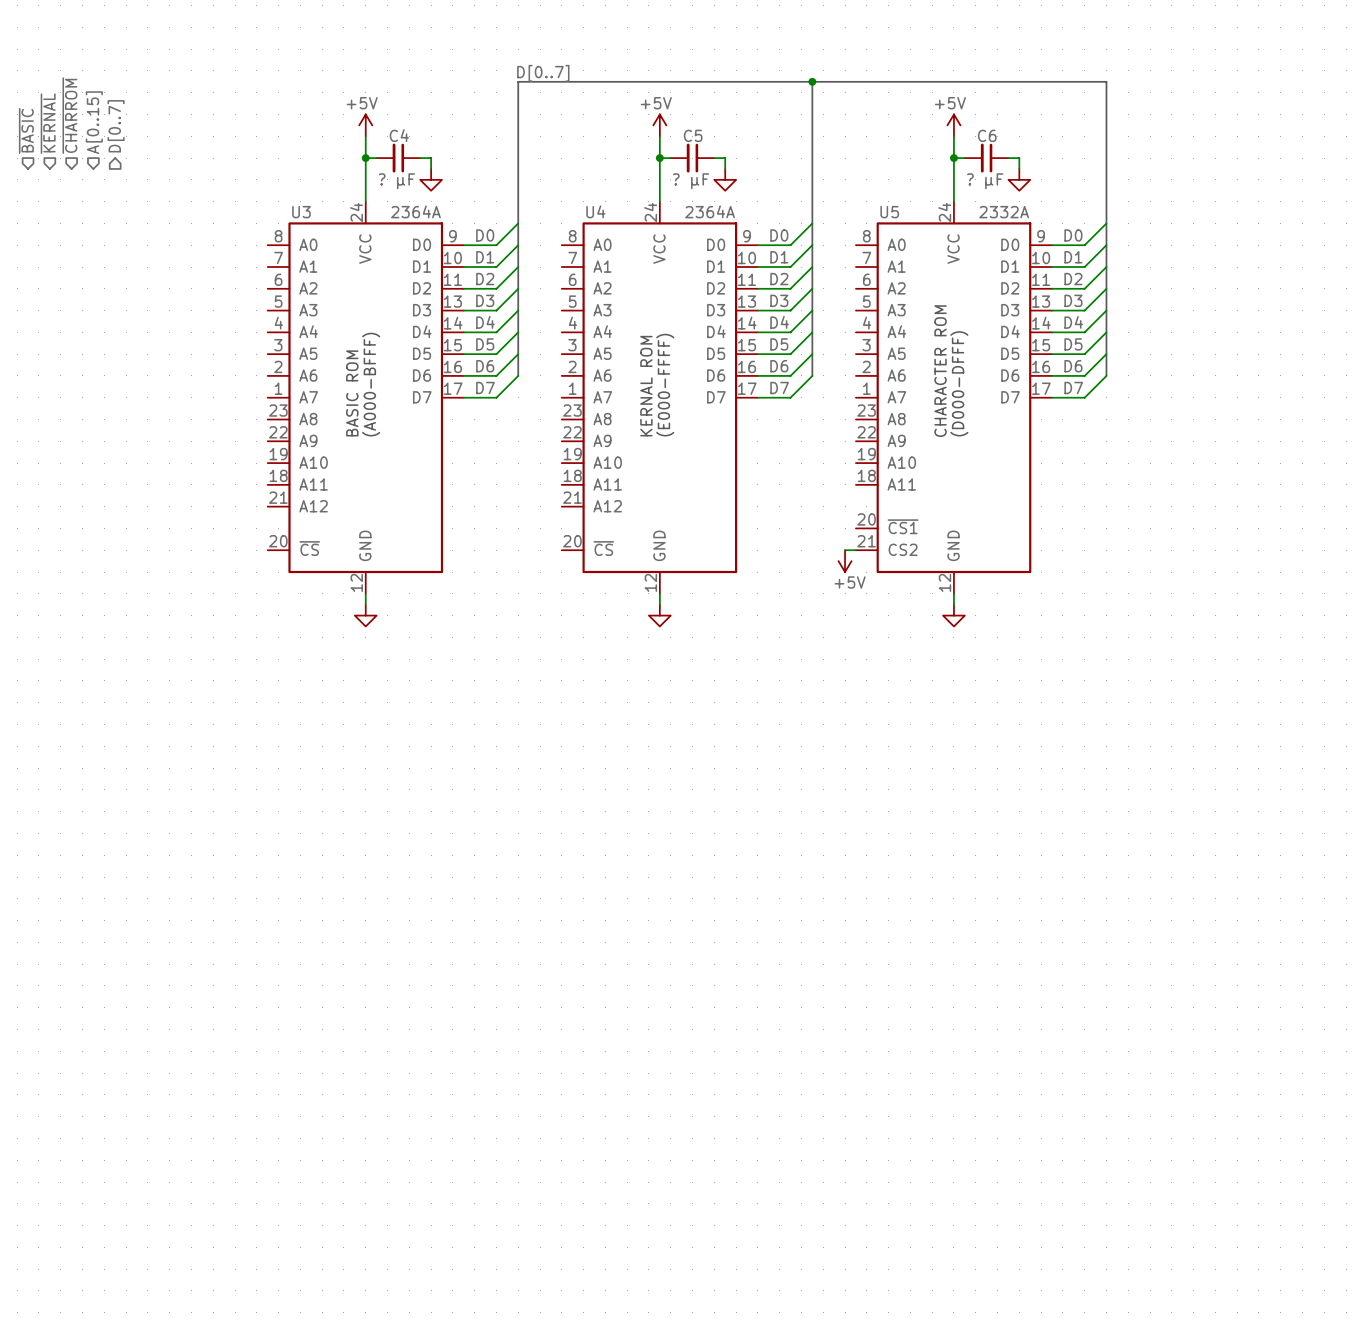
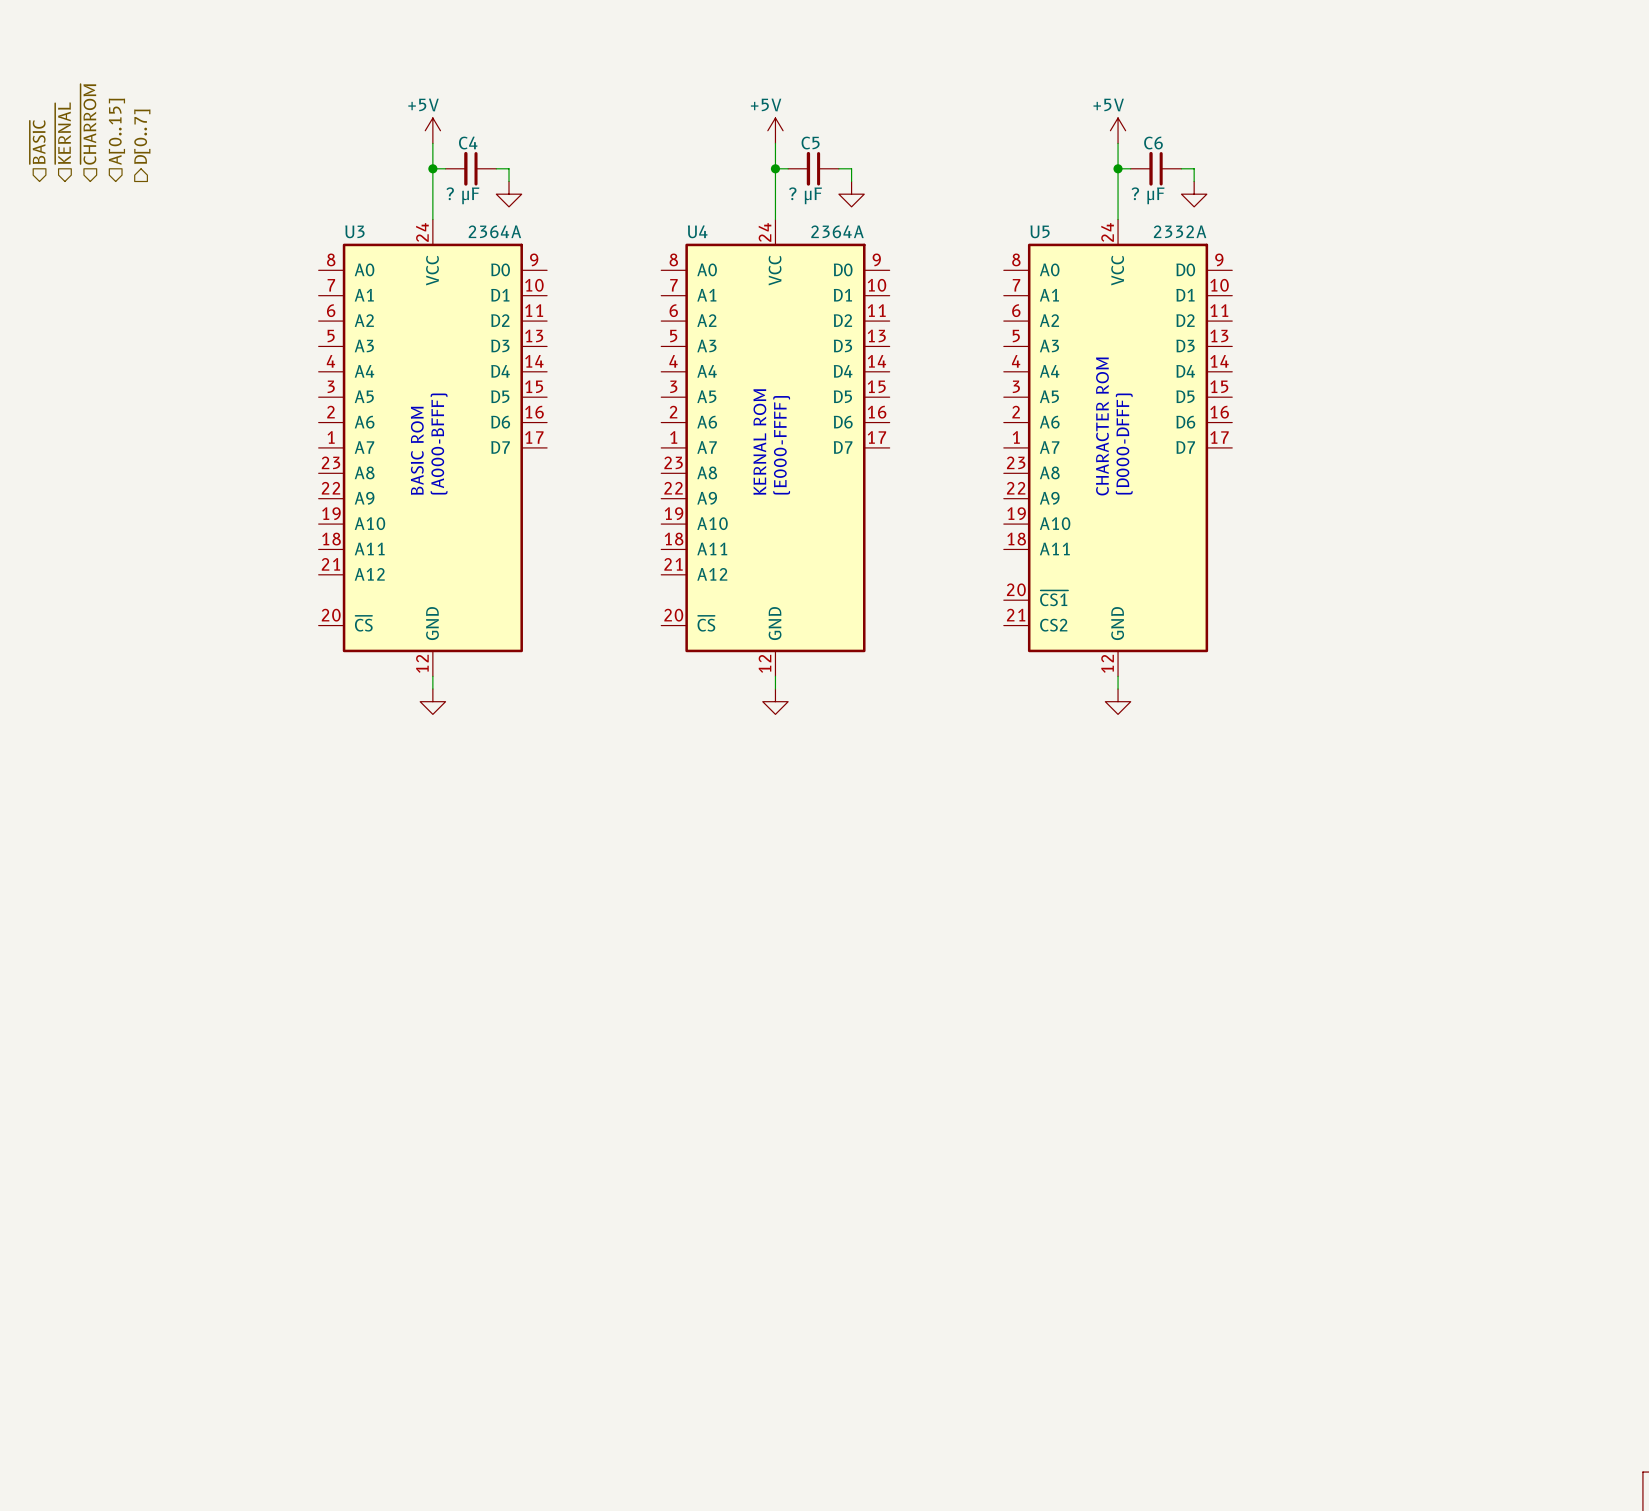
label: D[0..7] (543, 73) -> none
bus: (812, 81) (812, 375) -> none
junction: (812, 81) -> none
wire: (518, 223) (496, 245) (463, 245) -> none
wire: (812, 223) (790, 245) (757, 245) -> none
wire: (1106, 223) (1084, 245) (1052, 245) -> none
label: D0 (485, 235) -> none
label: D0 (779, 235) -> none
label: D0 (1073, 235) -> none
wire: (518, 245) (496, 267) (463, 267) -> none
wire: (812, 245) (790, 267) (757, 267) -> none
wire: (1106, 245) (1084, 267) (1052, 267) -> none
label: D1 (485, 257) -> none
label: D1 (779, 257) -> none
label: D1 (1073, 257) -> none
wire: (518, 267) (496, 288) (463, 288) -> none
wire: (812, 267) (790, 288) (757, 288) -> none
wire: (1106, 267) (1084, 288) (1052, 288) -> none
label: D2 (485, 279) -> none
label: D2 (779, 279) -> none
label: D2 (1073, 279) -> none
wire: (518, 288) (496, 310) (463, 310) -> none
wire: (812, 288) (790, 310) (757, 310) -> none
wire: (1106, 288) (1084, 310) (1052, 310) -> none
label: D3 (485, 300) -> none
label: D3 (779, 300) -> none
label: D3 (1073, 300) -> none
wire: (518, 310) (496, 332) (463, 332) -> none
wire: (812, 310) (790, 332) (757, 332) -> none
wire: (1106, 310) (1084, 332) (1052, 332) -> none
label: D4 (485, 322) -> none
label: D4 (779, 322) -> none
label: D4 (1073, 322) -> none
wire: (518, 332) (496, 354) (463, 354) -> none
wire: (812, 332) (790, 354) (757, 354) -> none
wire: (1106, 332) (1084, 354) (1052, 354) -> none
label: D5 (485, 344) -> none
label: D5 (779, 344) -> none
label: D5 (1073, 344) -> none
wire: (518, 354) (496, 375) (463, 375) -> none
wire: (812, 354) (790, 375) (757, 375) -> none
wire: (1106, 354) (1084, 375) (1052, 375) -> none
label: D6 (485, 366) -> none
label: D6 (779, 366) -> none
label: D6 (1073, 366) -> none
wire: (518, 375) (496, 397) (463, 397) -> none
bus: (518, 375) (518, 81) (1106, 81) (1106, 375) -> none
wire: (812, 375) (790, 397) (757, 397) -> none
wire: (1106, 375) (1084, 397) (1052, 397) -> none
label: D7 (485, 387) -> none
label: D7 (779, 387) -> none
label: D7 (1073, 387) -> none
wire: (845, 550) (855, 550) -> none
power symbol: +5V (845, 561) -> none

